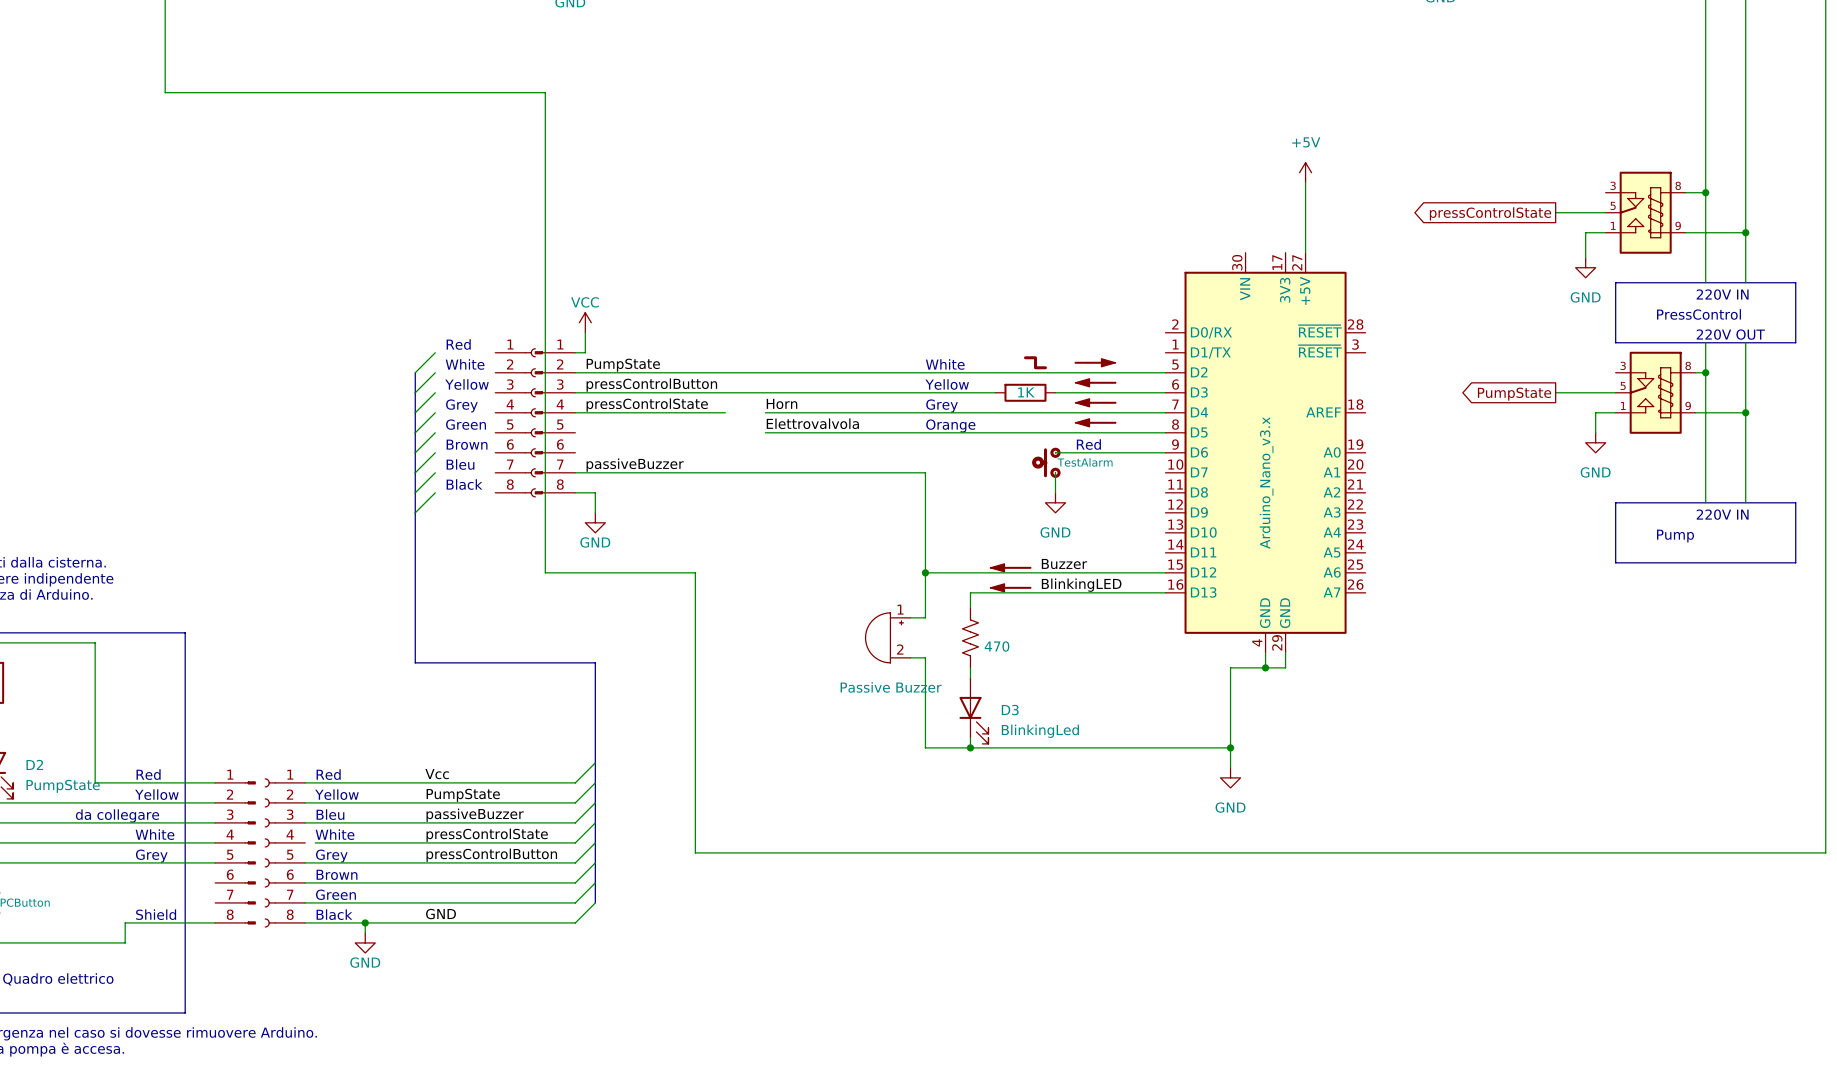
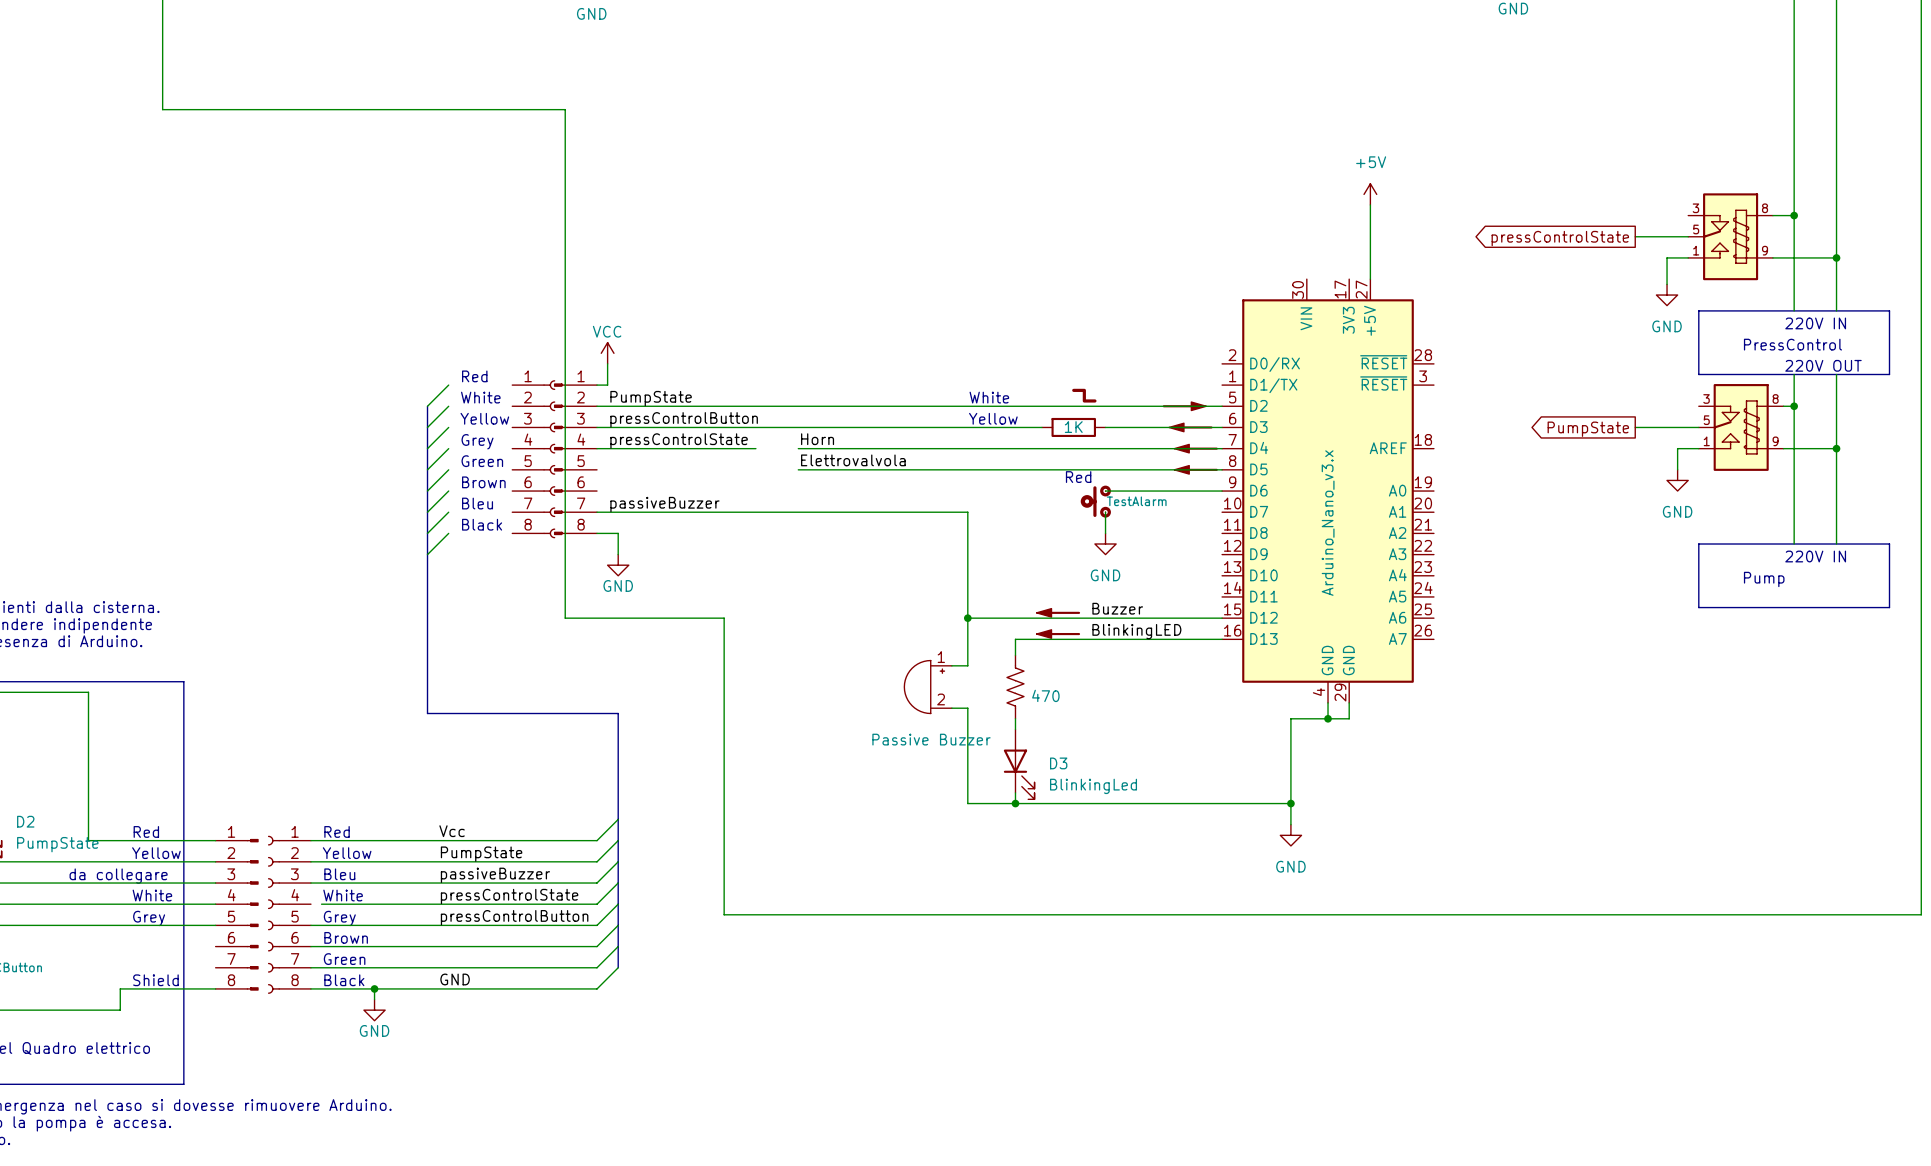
power symbol: (1095, 362) -> none
power symbol: none -> (1184, 406)
power symbol: (1096, 382) -> none
power symbol: none -> (1190, 427)
power symbol: (1096, 402) -> none
text: Grey (942, 405) -> none
power symbol: none -> (1196, 448)
power symbol: (1096, 422) -> none
text: Orange (950, 425) -> none
power symbol: none -> (1196, 469)
text position: Red (1088, 444) -> Red (1078, 477)

